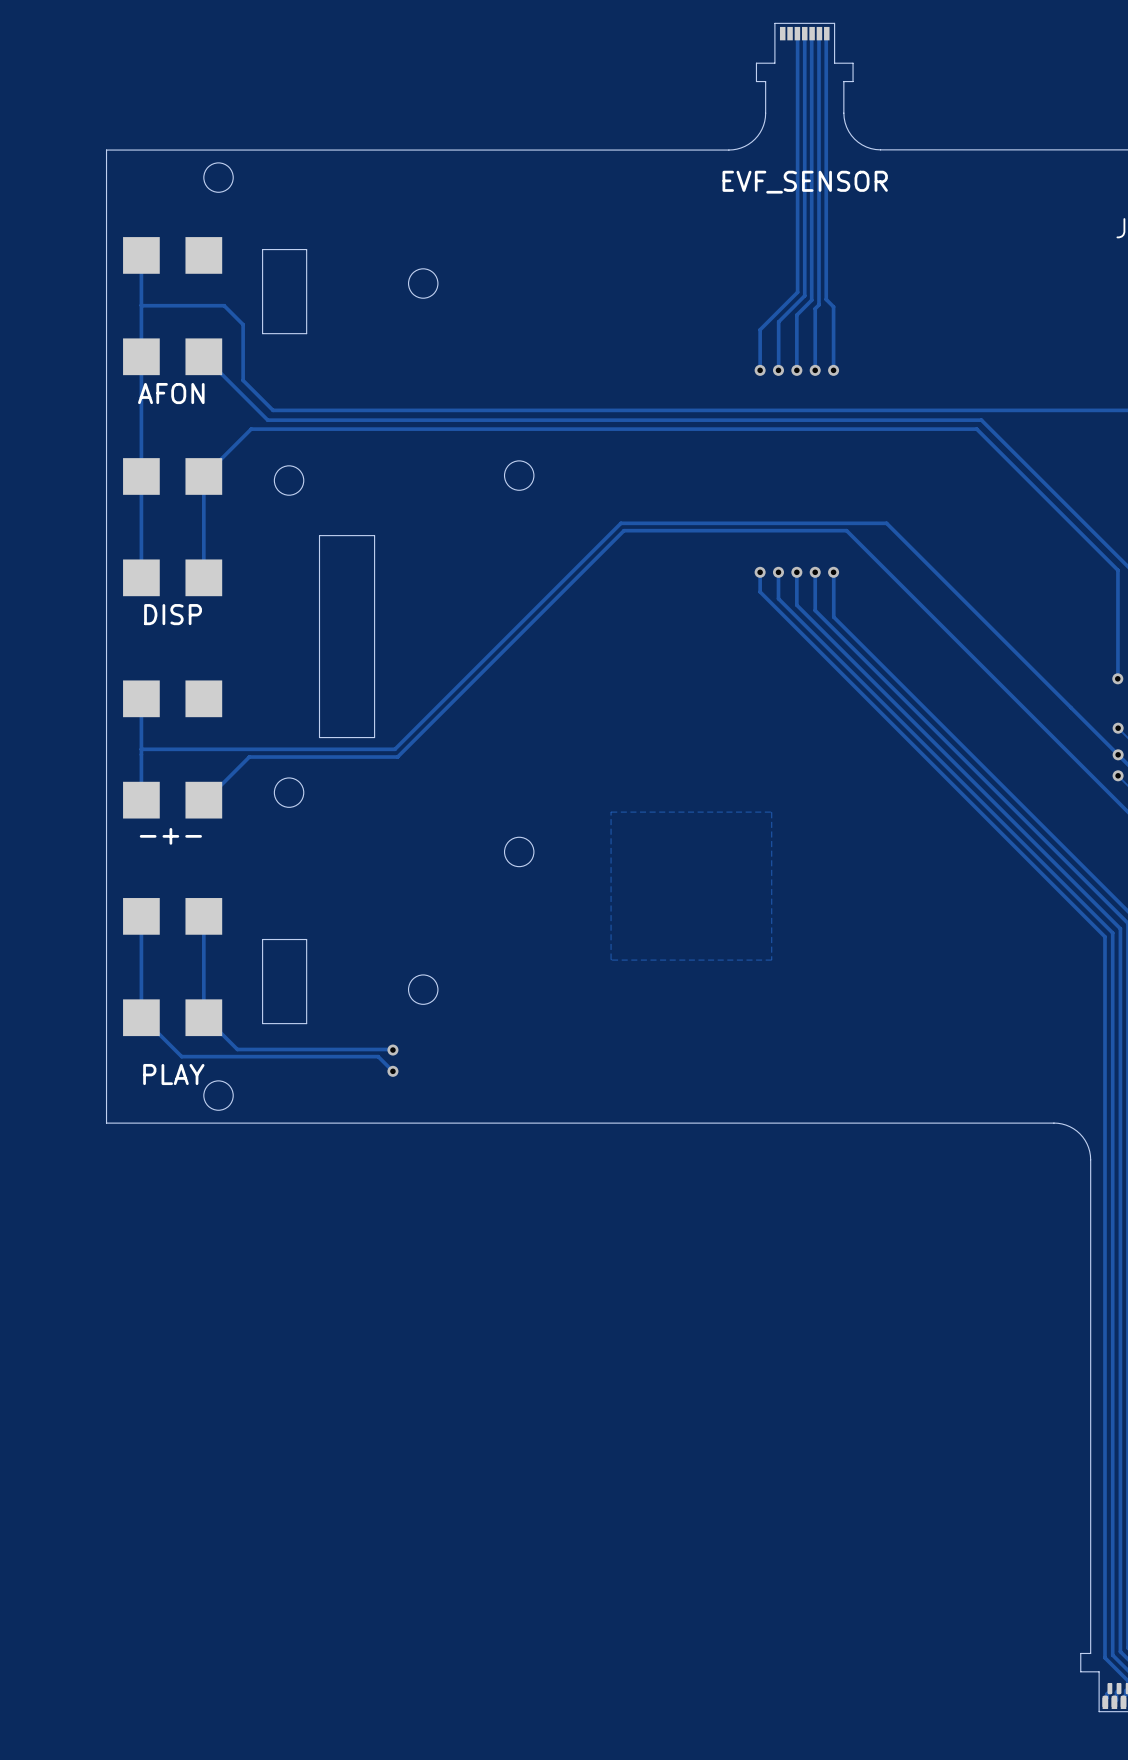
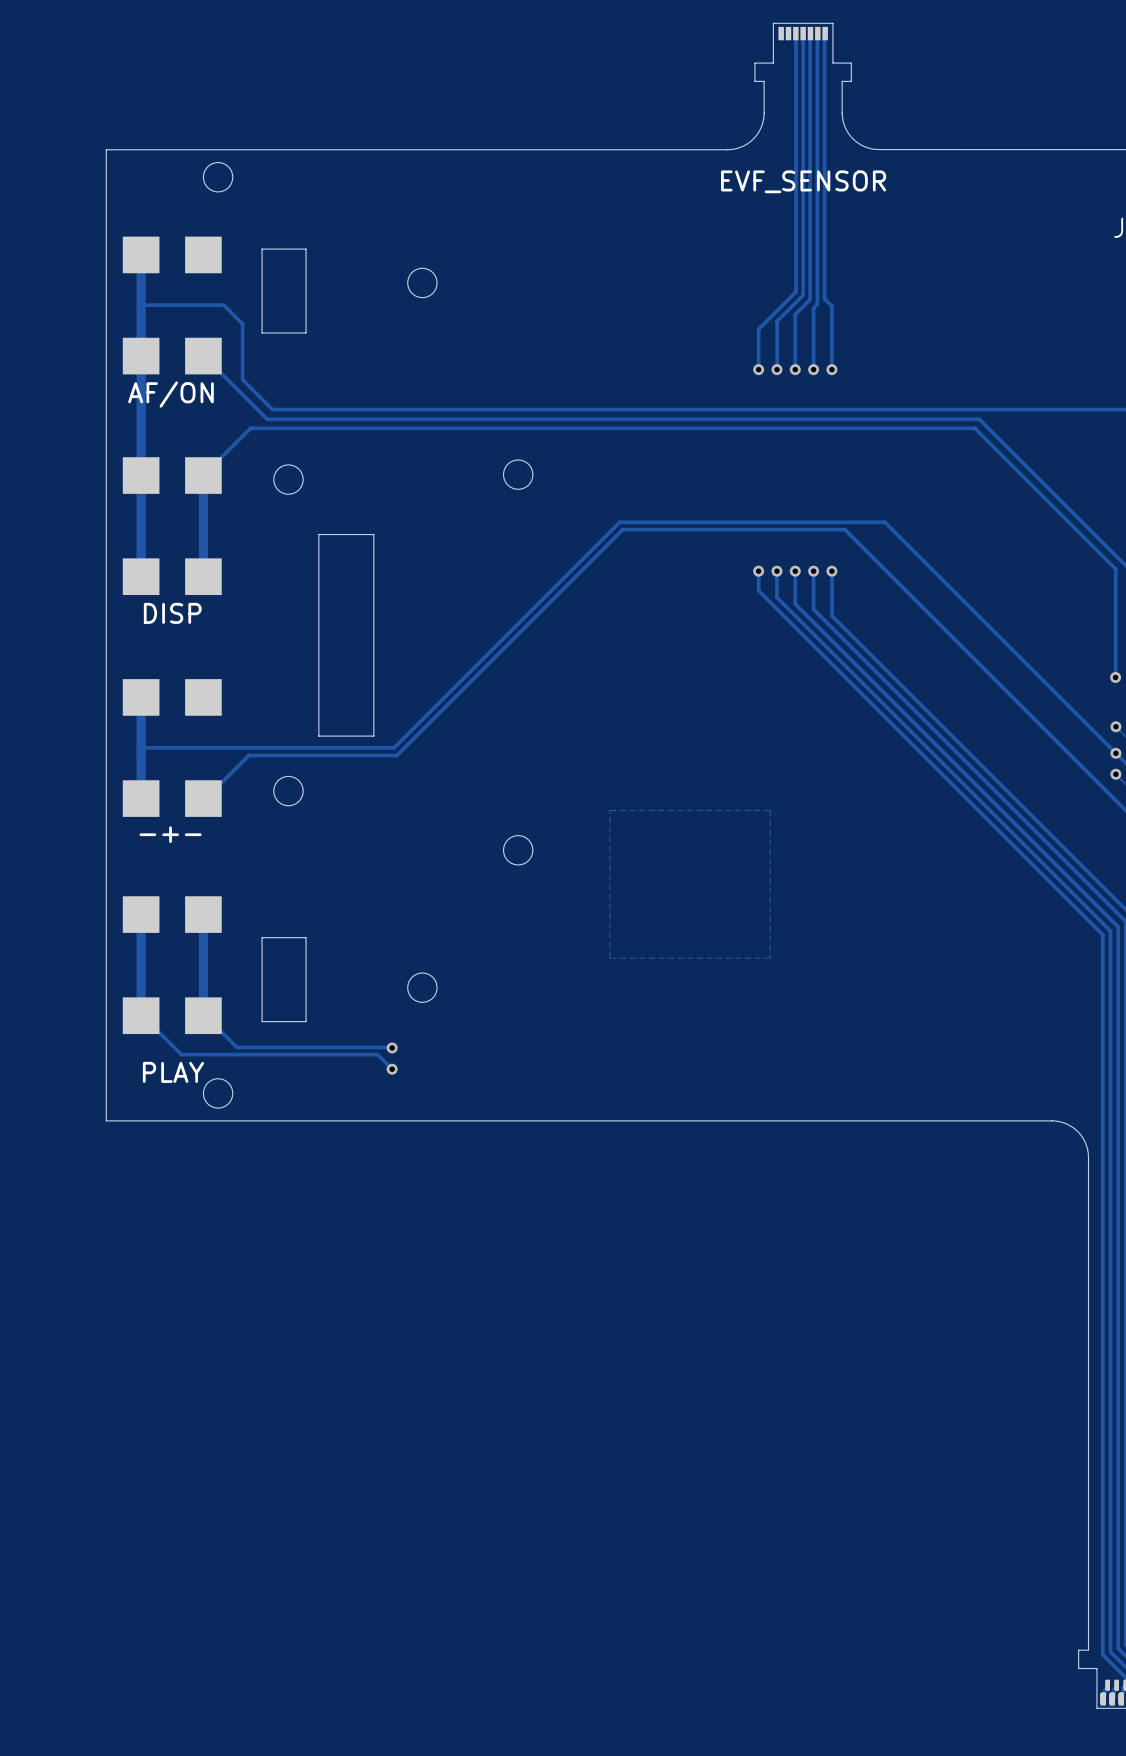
track width: thin (141, 255) (141, 577) -> thick (141, 254) (141, 576)
part value: AFON (171, 393) -> AF/ON (170, 394)
track width: thin (203, 476) (203, 577) -> thick (203, 475) (203, 576)
track width: thin (141, 698) (141, 800) -> thick (141, 697) (141, 798)
track width: thin (141, 916) (141, 1017) -> thick (141, 914) (141, 1015)
track width: thin (203, 916) (203, 1017) -> thick (203, 914) (203, 1015)

